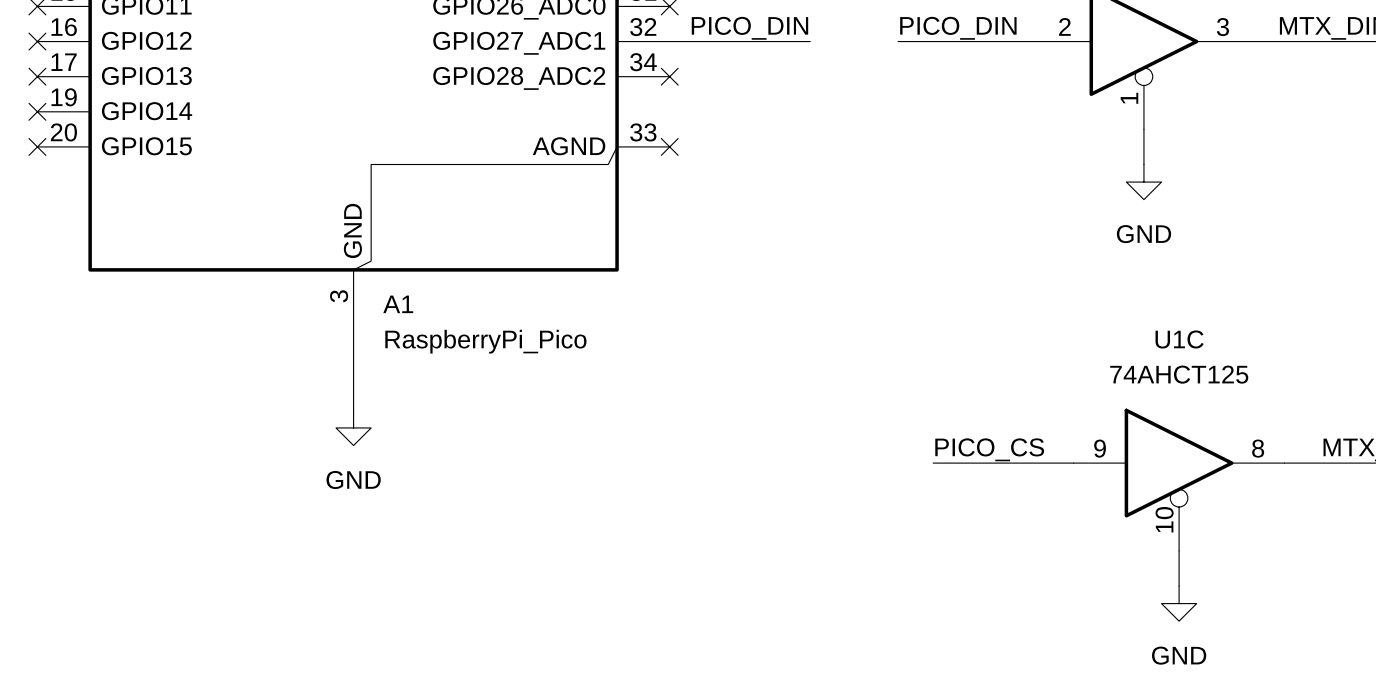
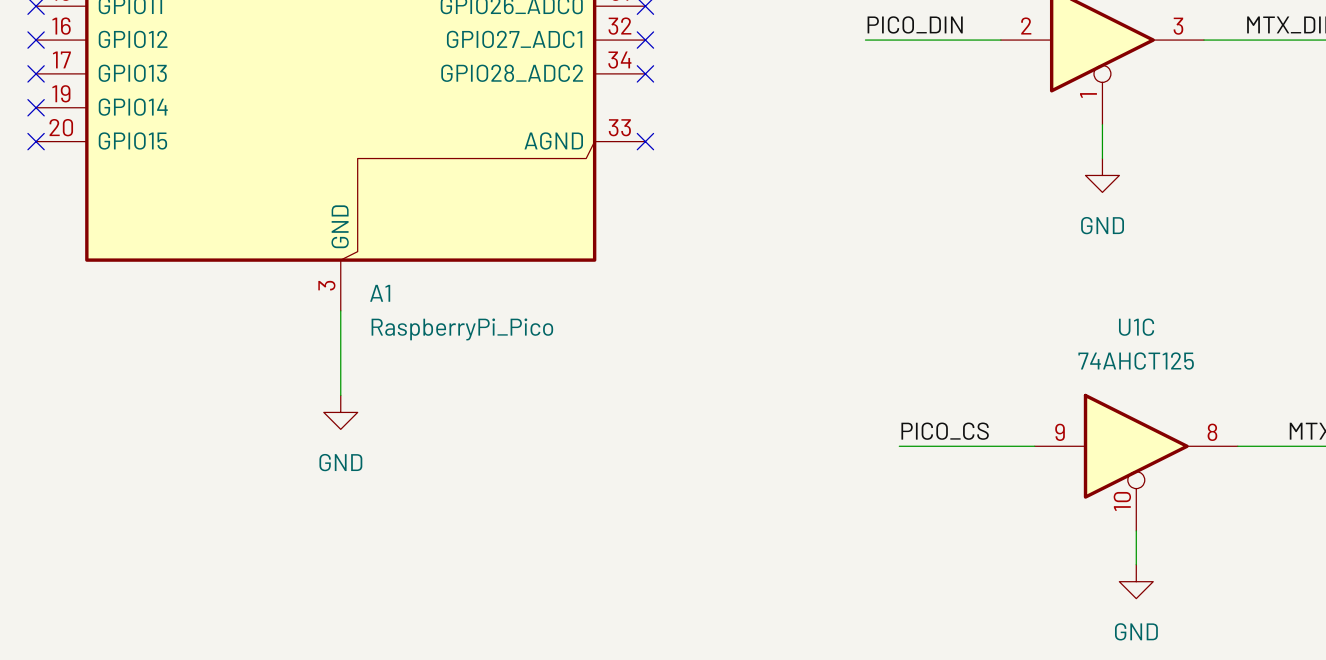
label: PICO_DIN (749, 28) -> none
wire: (669, 41) (810, 41) -> none
no-connect mark: none -> (645, 40)

